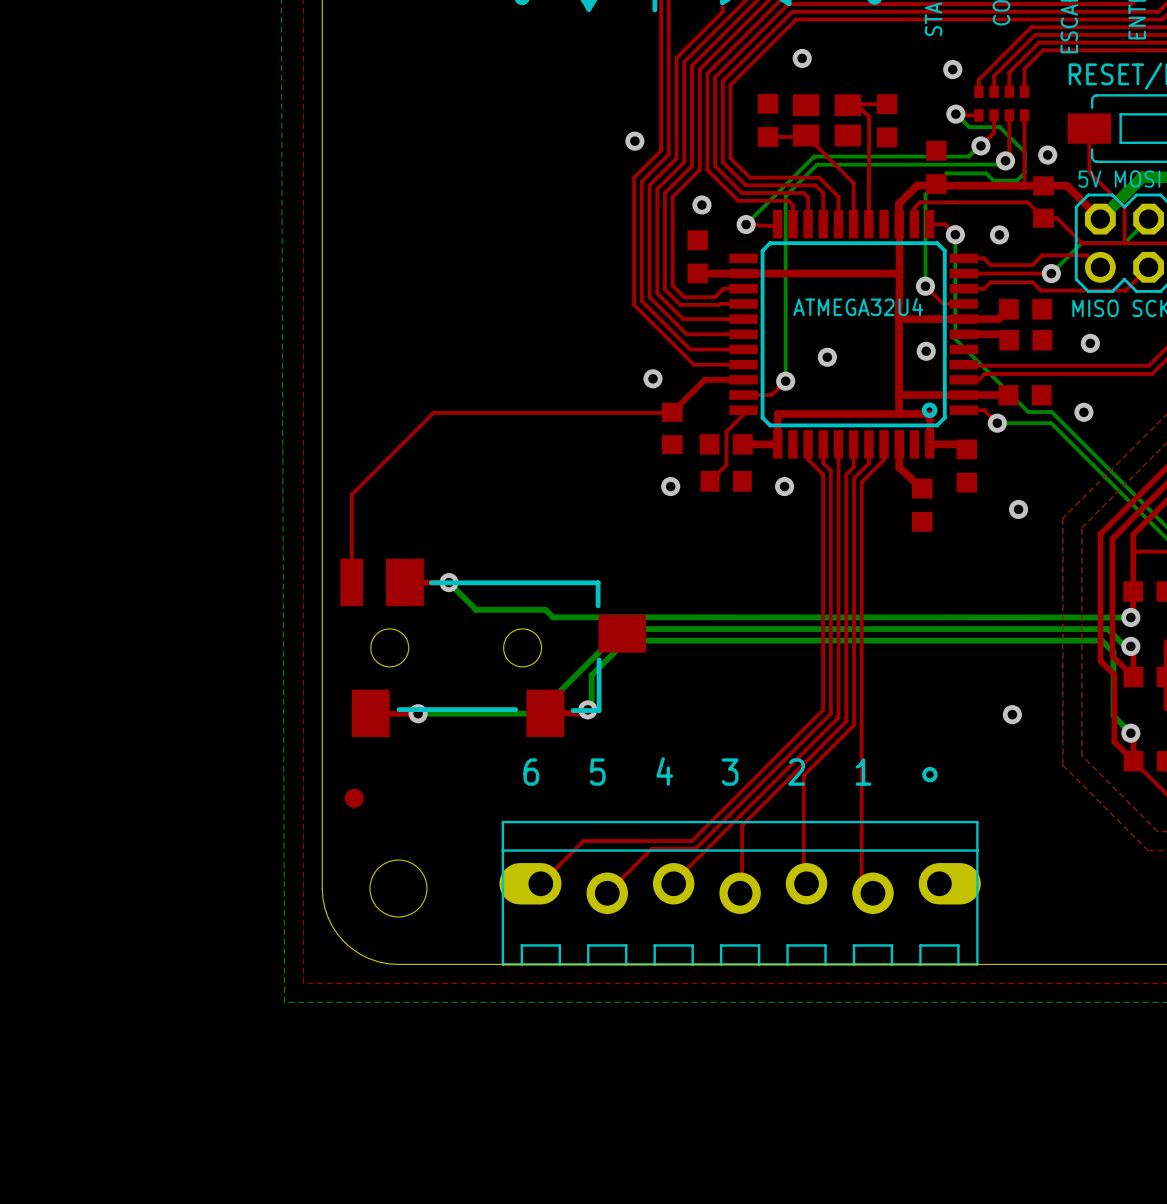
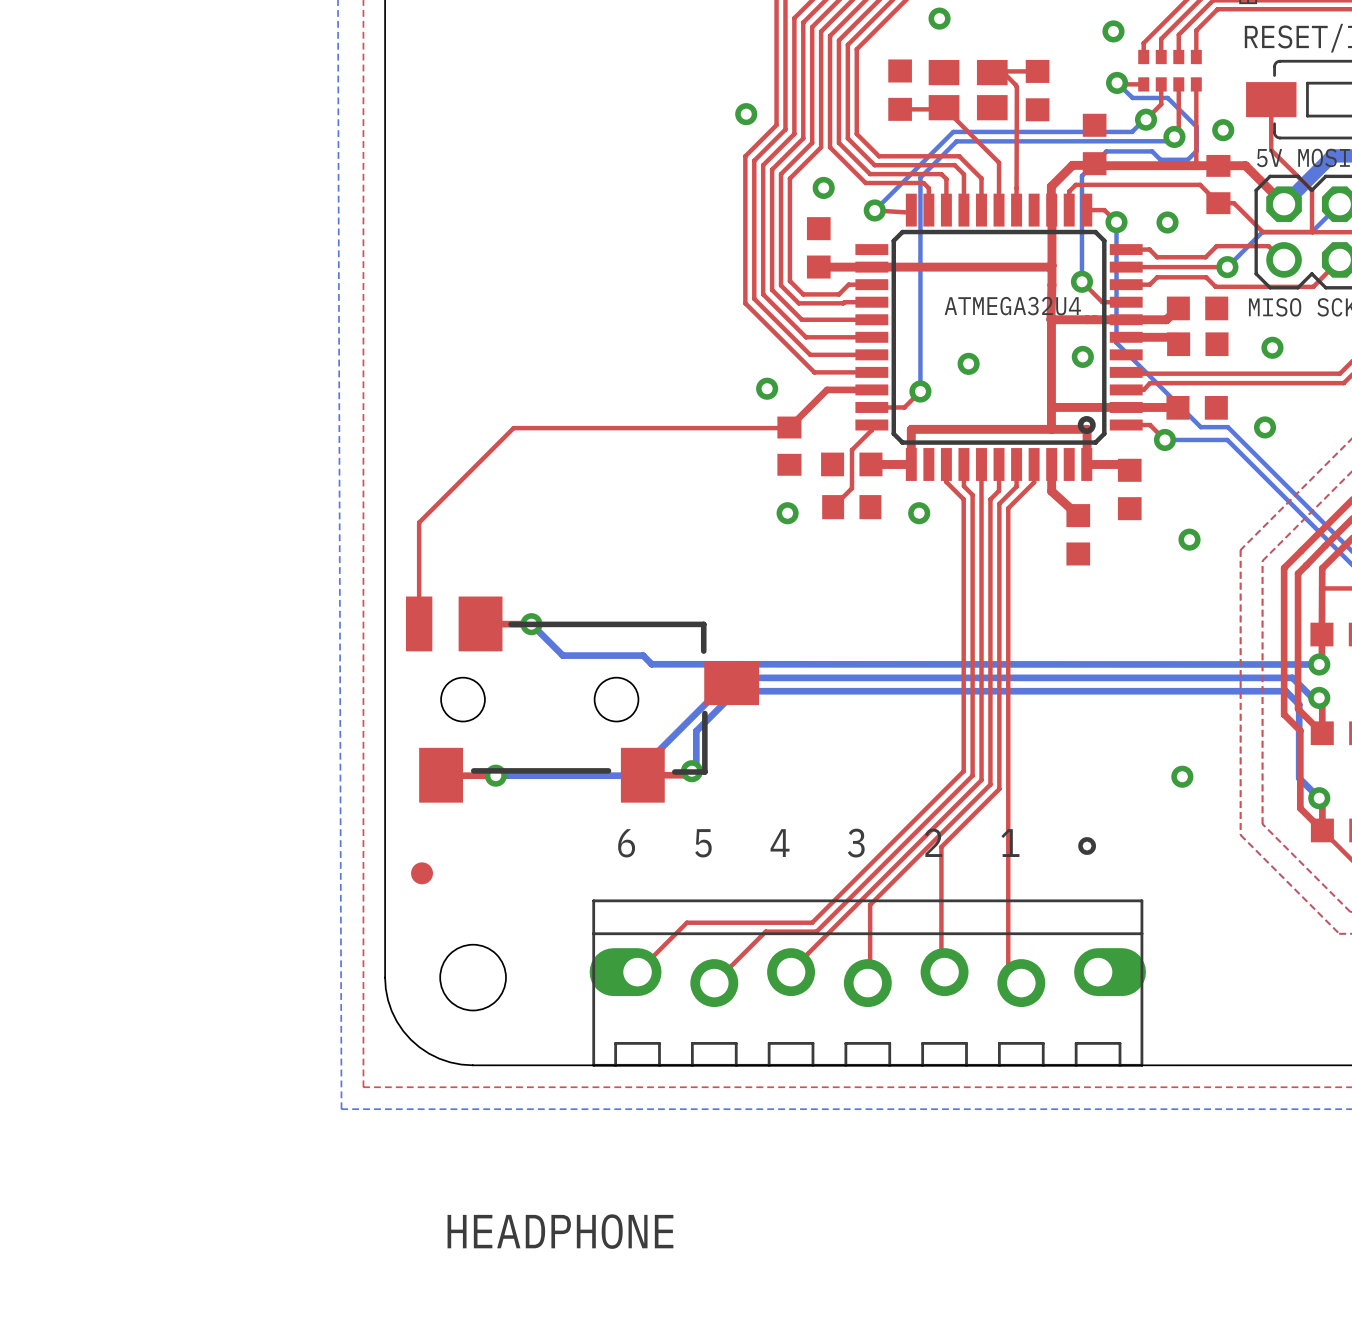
text: none -> HEADPHONE (560, 1231)

